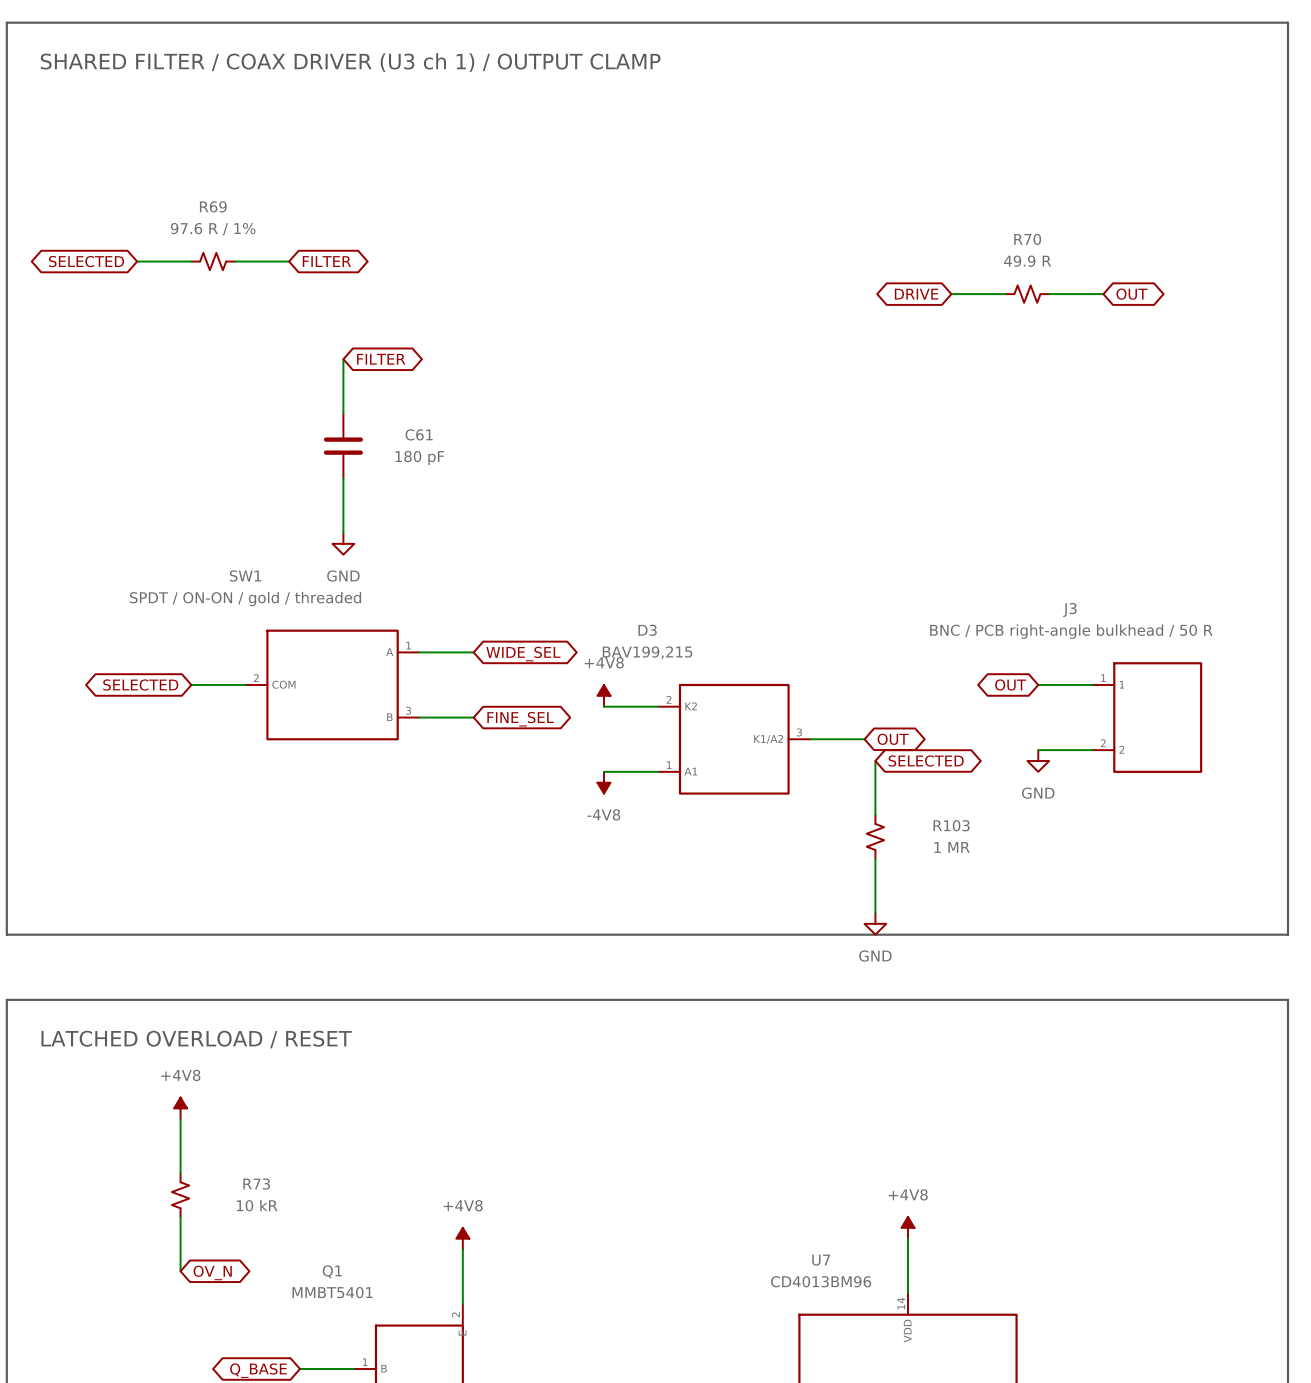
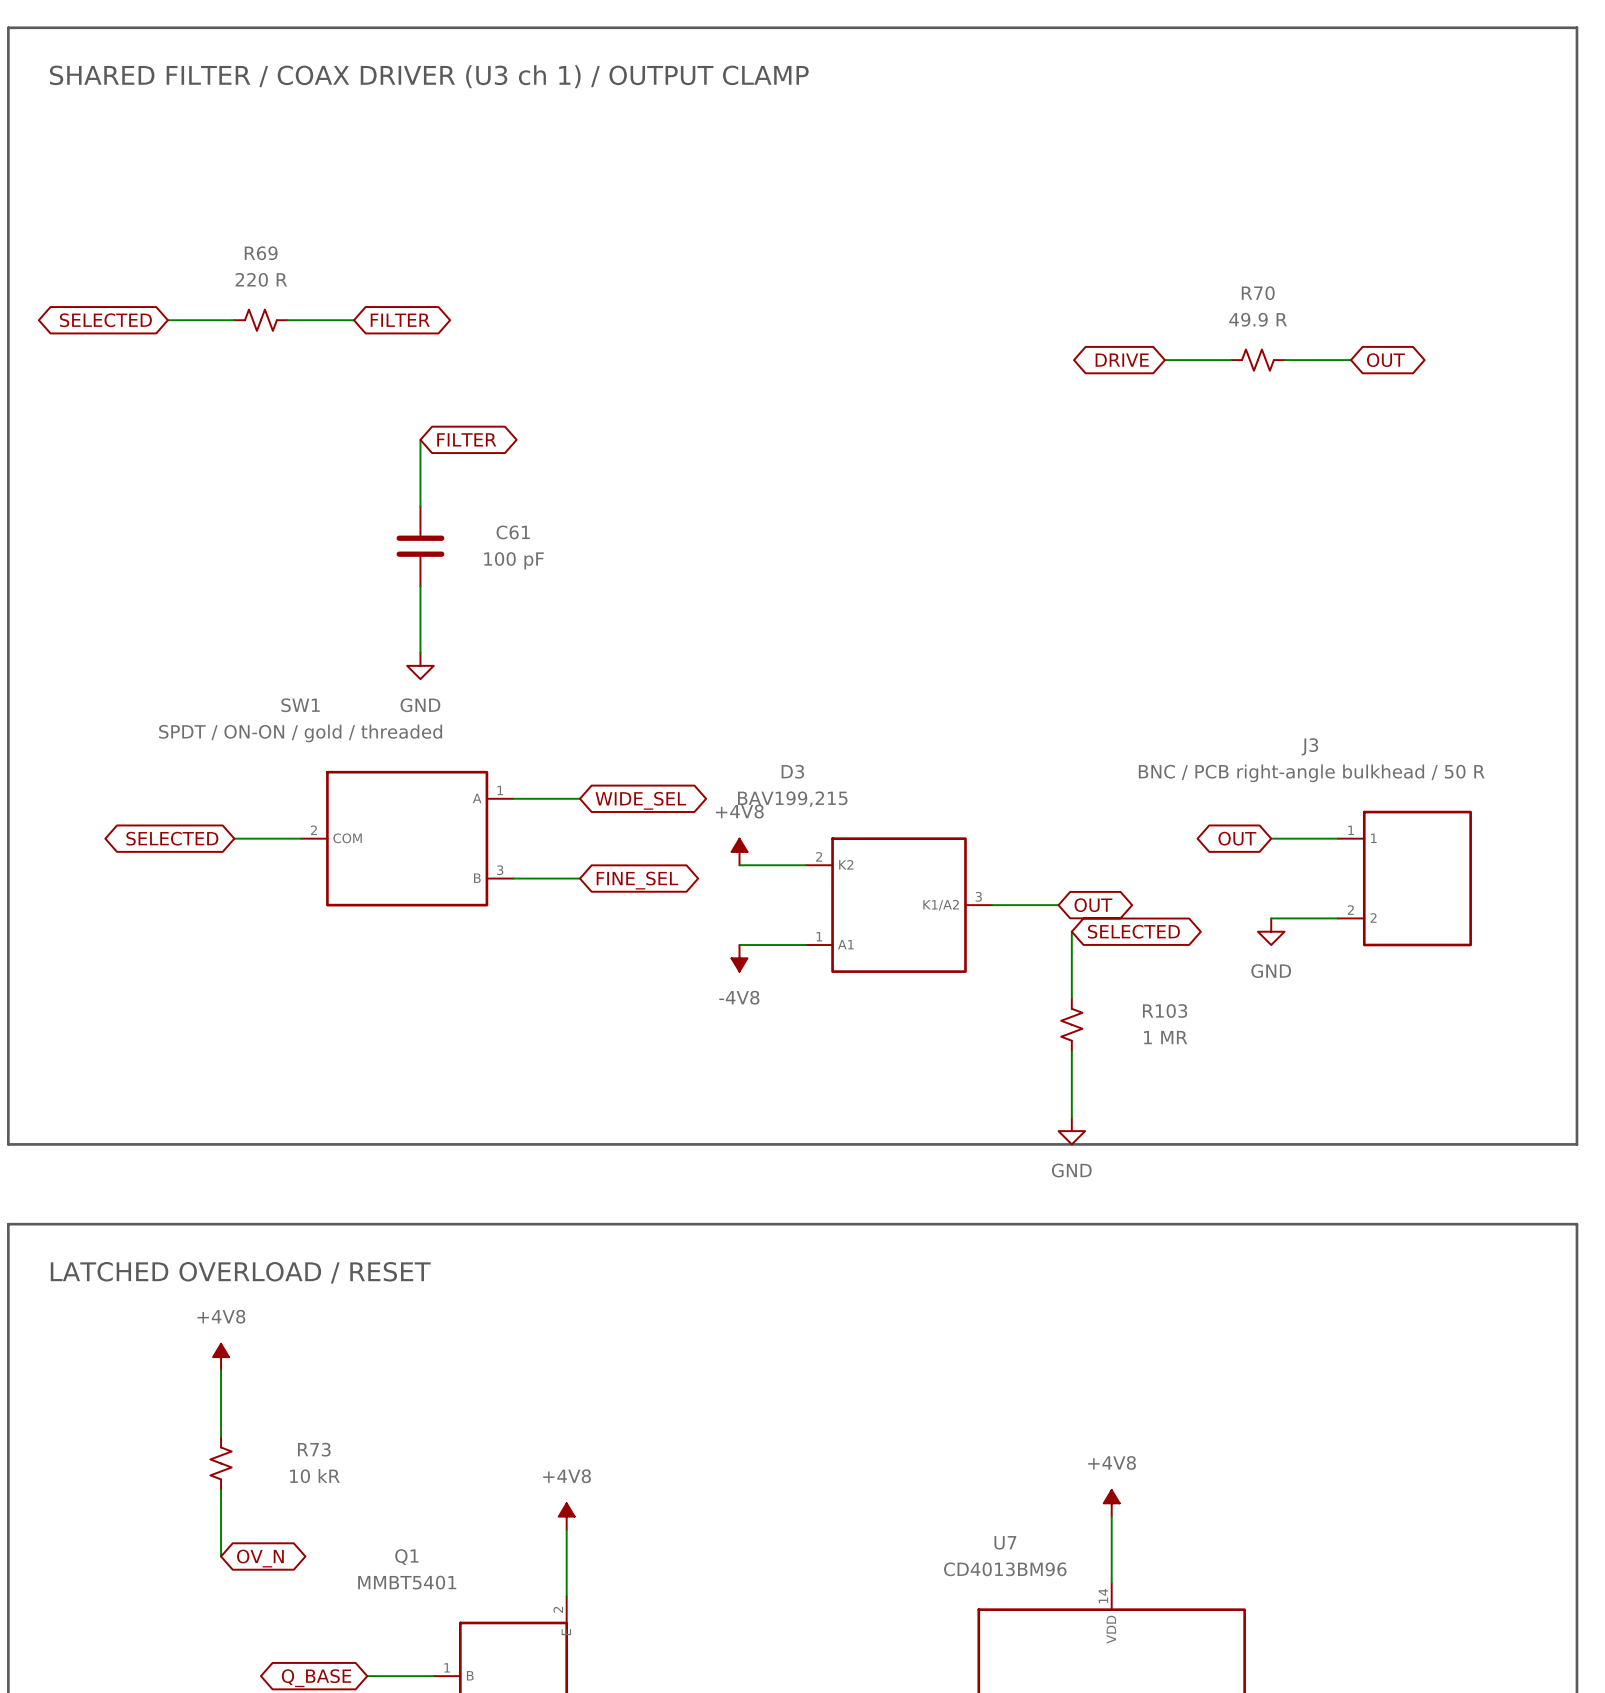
R69 value: 97.6 R / 1% (213, 229) -> 220 R (261, 279)
C61 value: 180 pF (419, 458) -> 100 pF (513, 560)

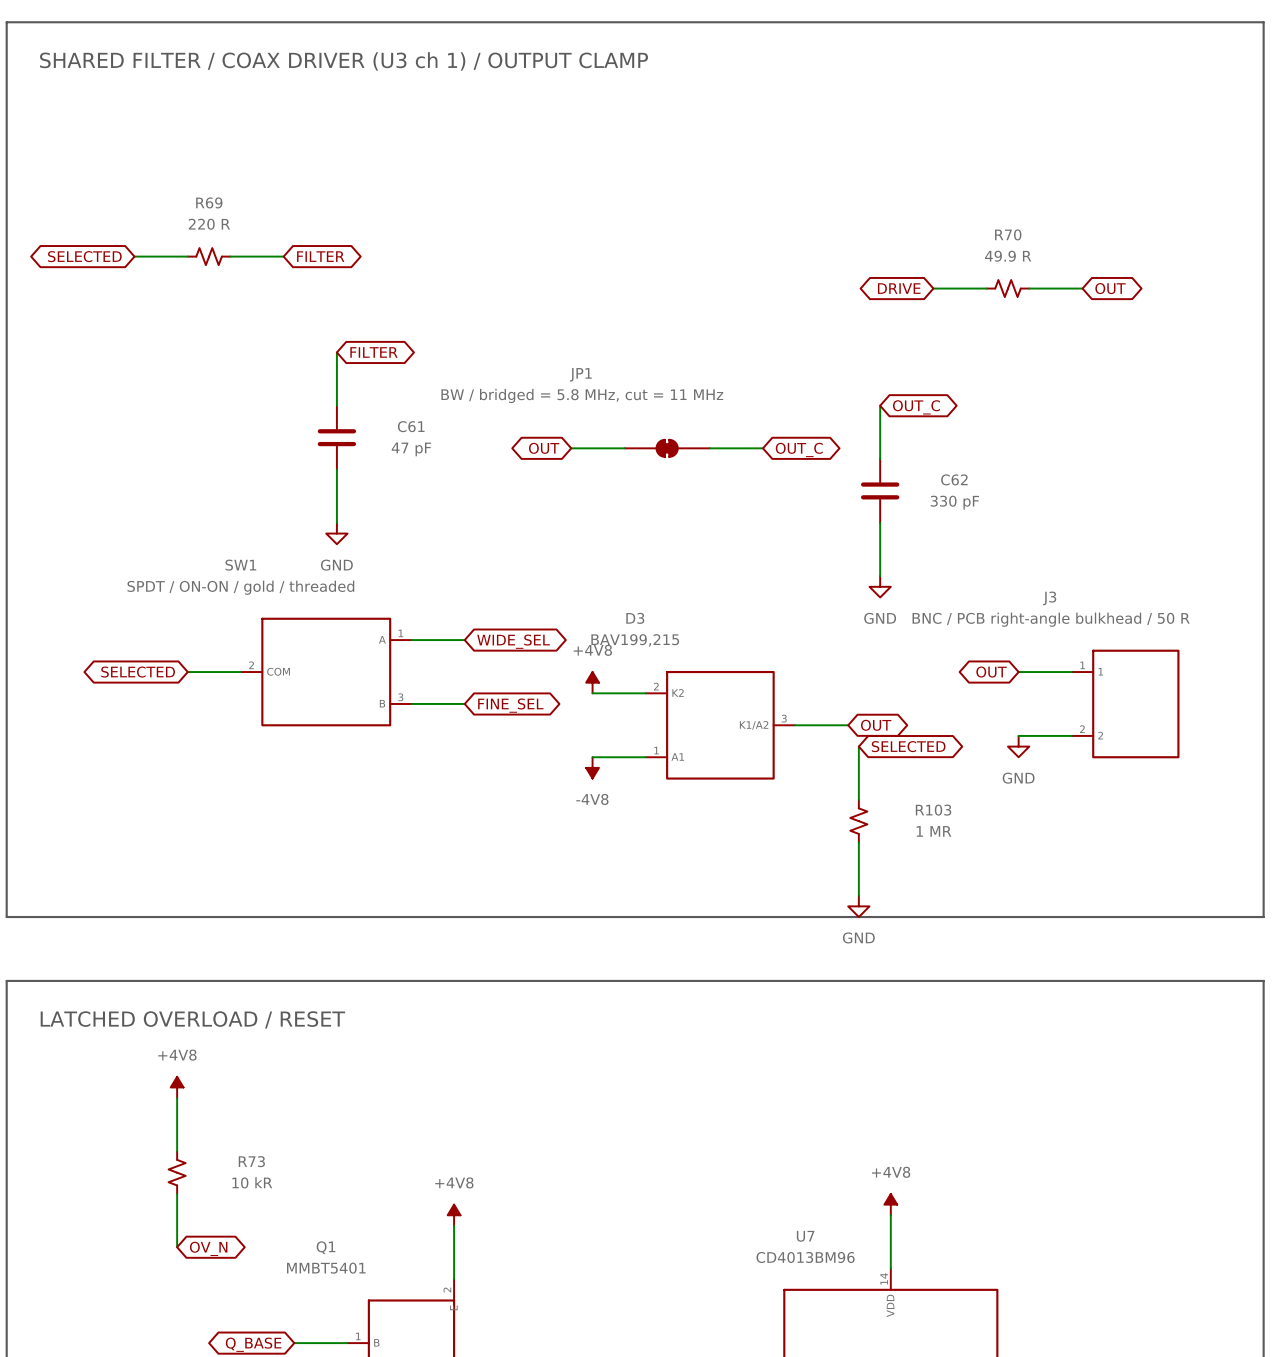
wire: none -> (880, 405) (880, 458)
global label: none -> OUT_C (916, 407)
global label: none -> OUT (544, 448)
wire: none -> (571, 448) (624, 448)
JP1: none -> BW / bridged = 5.8 MHz, cut = 11 MHz (667, 448)
wire: none -> (709, 448) (762, 448)
C61 value: 100 pF (513, 560) -> 47 pF (411, 449)
global label: none -> OUT_C (799, 449)
C62: none -> 330 pF (880, 490)
wire: none -> (880, 522) (880, 576)
power symbol: none -> GND (880, 586)

